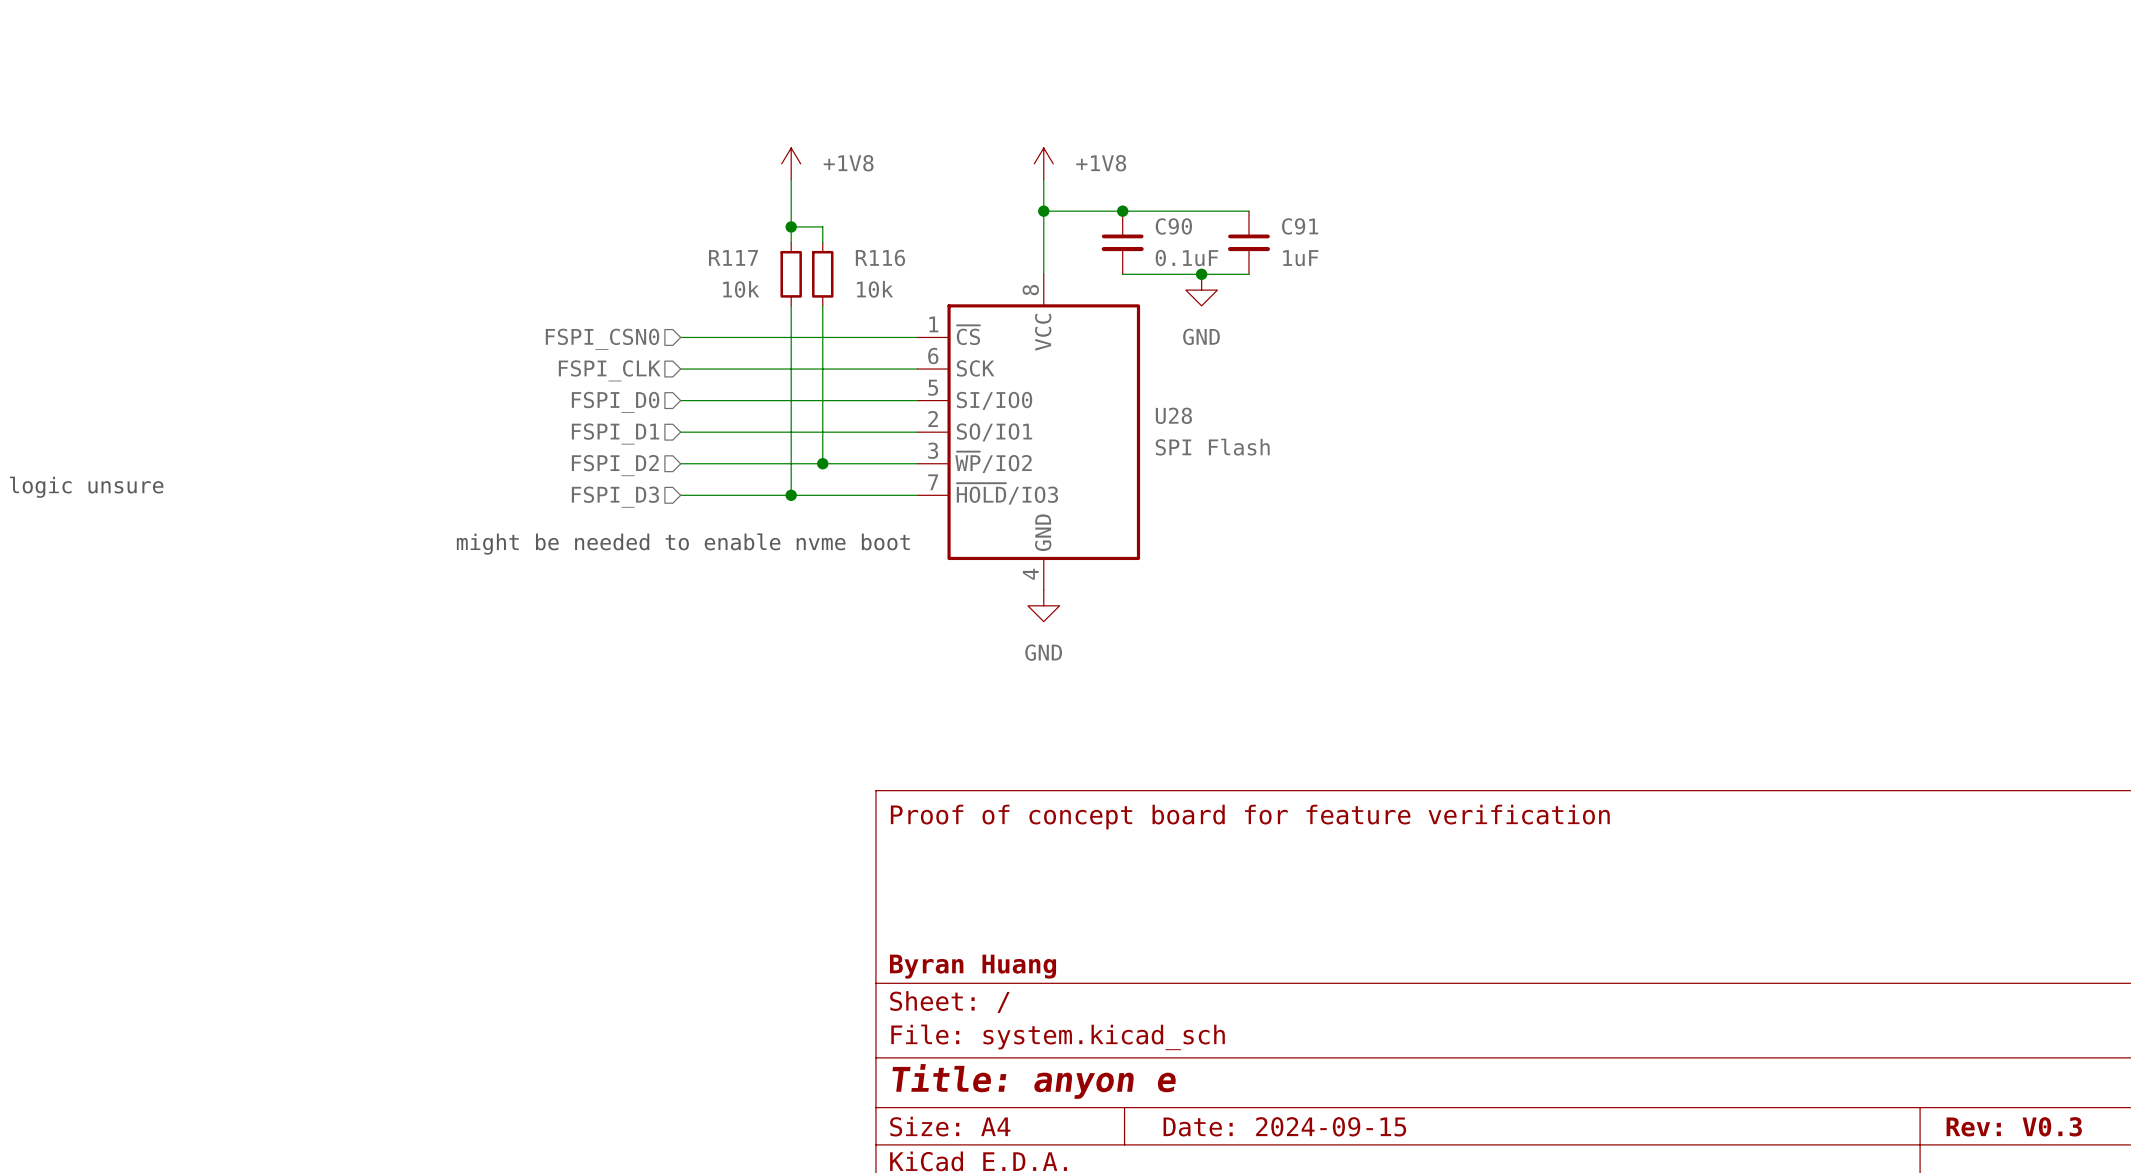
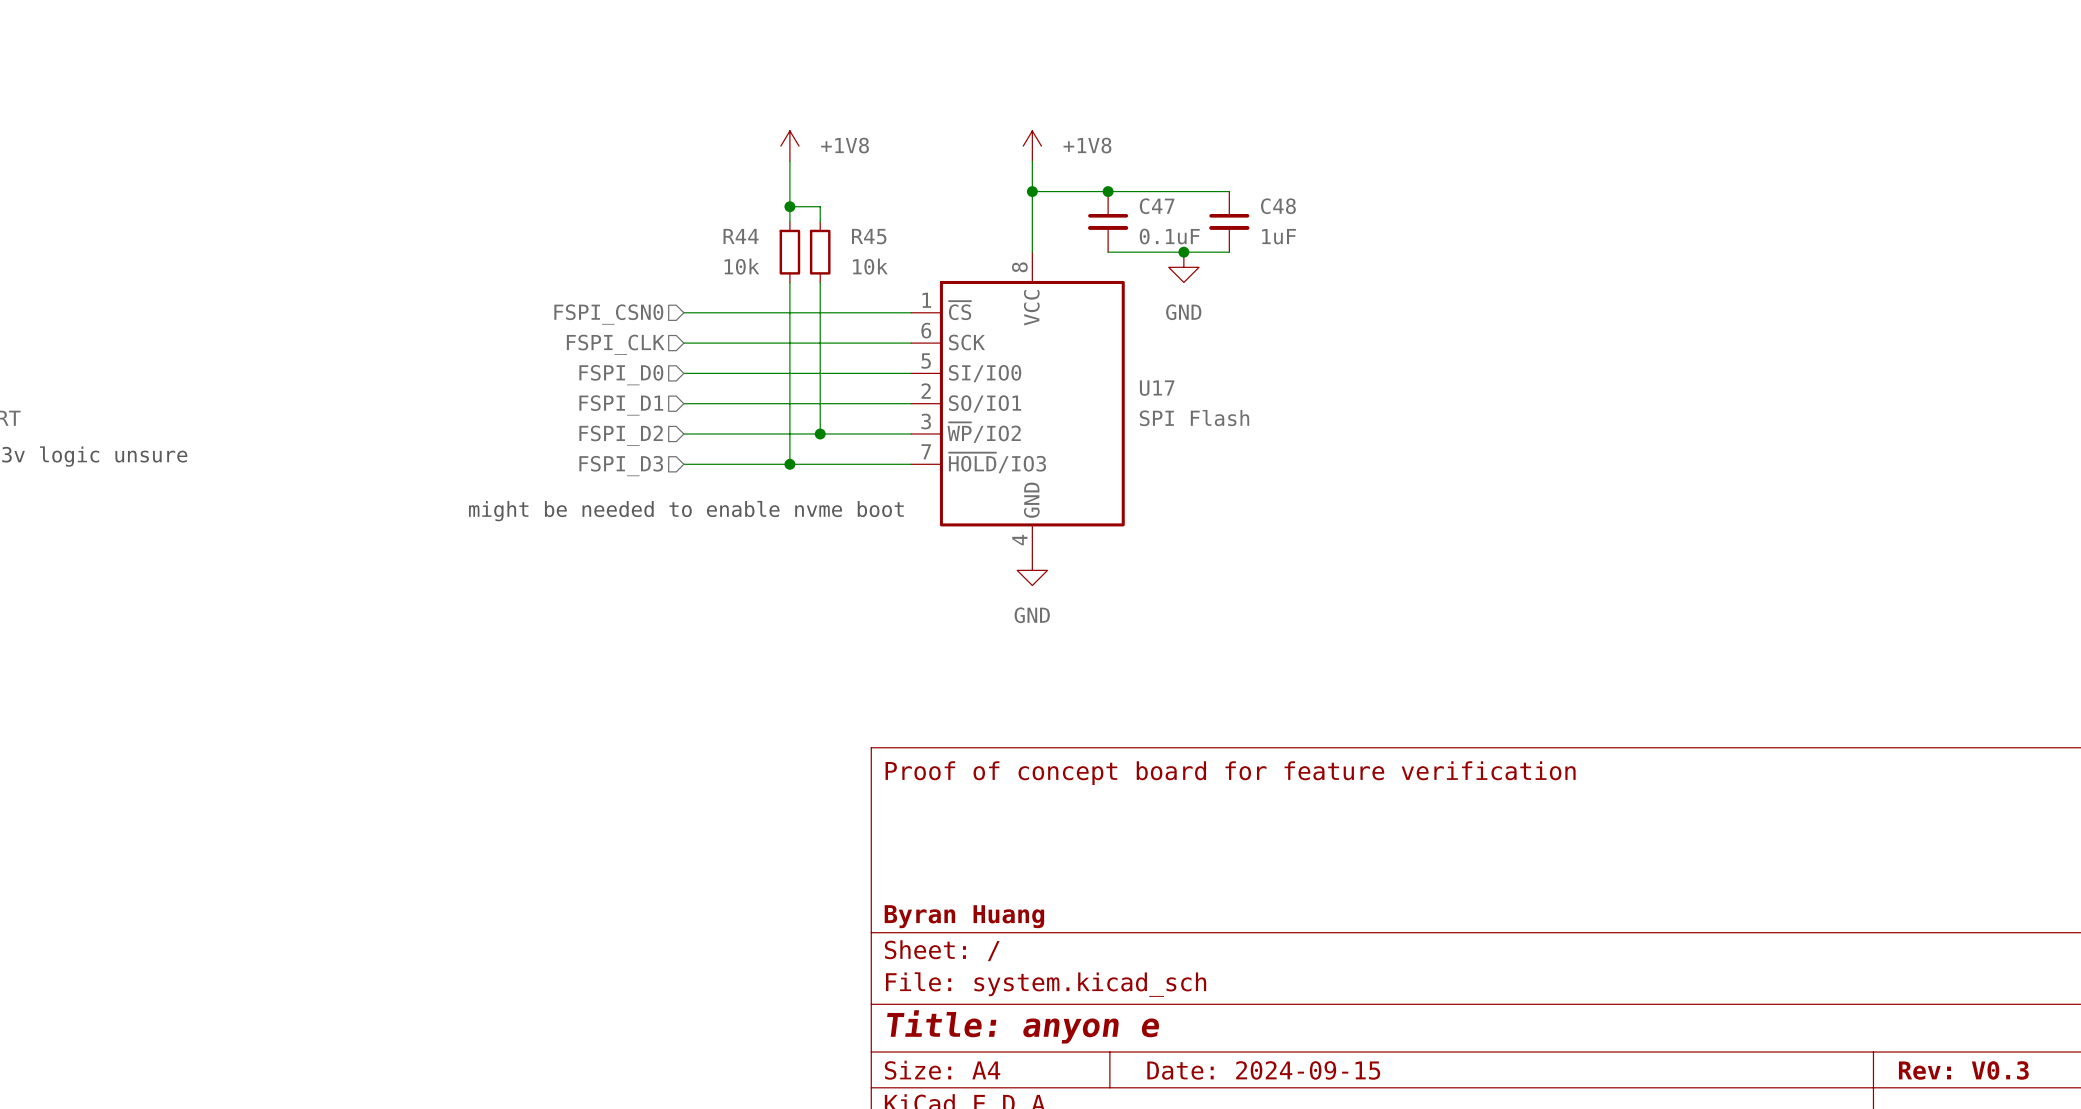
C90 name: C90 (1173, 226) -> C47 (1157, 206)
C91 name: C91 (1300, 226) -> C48 (1278, 206)
R117 name: R117 (733, 257) -> R44 (741, 236)
R116 name: R116 (880, 257) -> R45 (869, 236)
U28 name: U28 (1173, 415) -> U17 (1157, 388)

